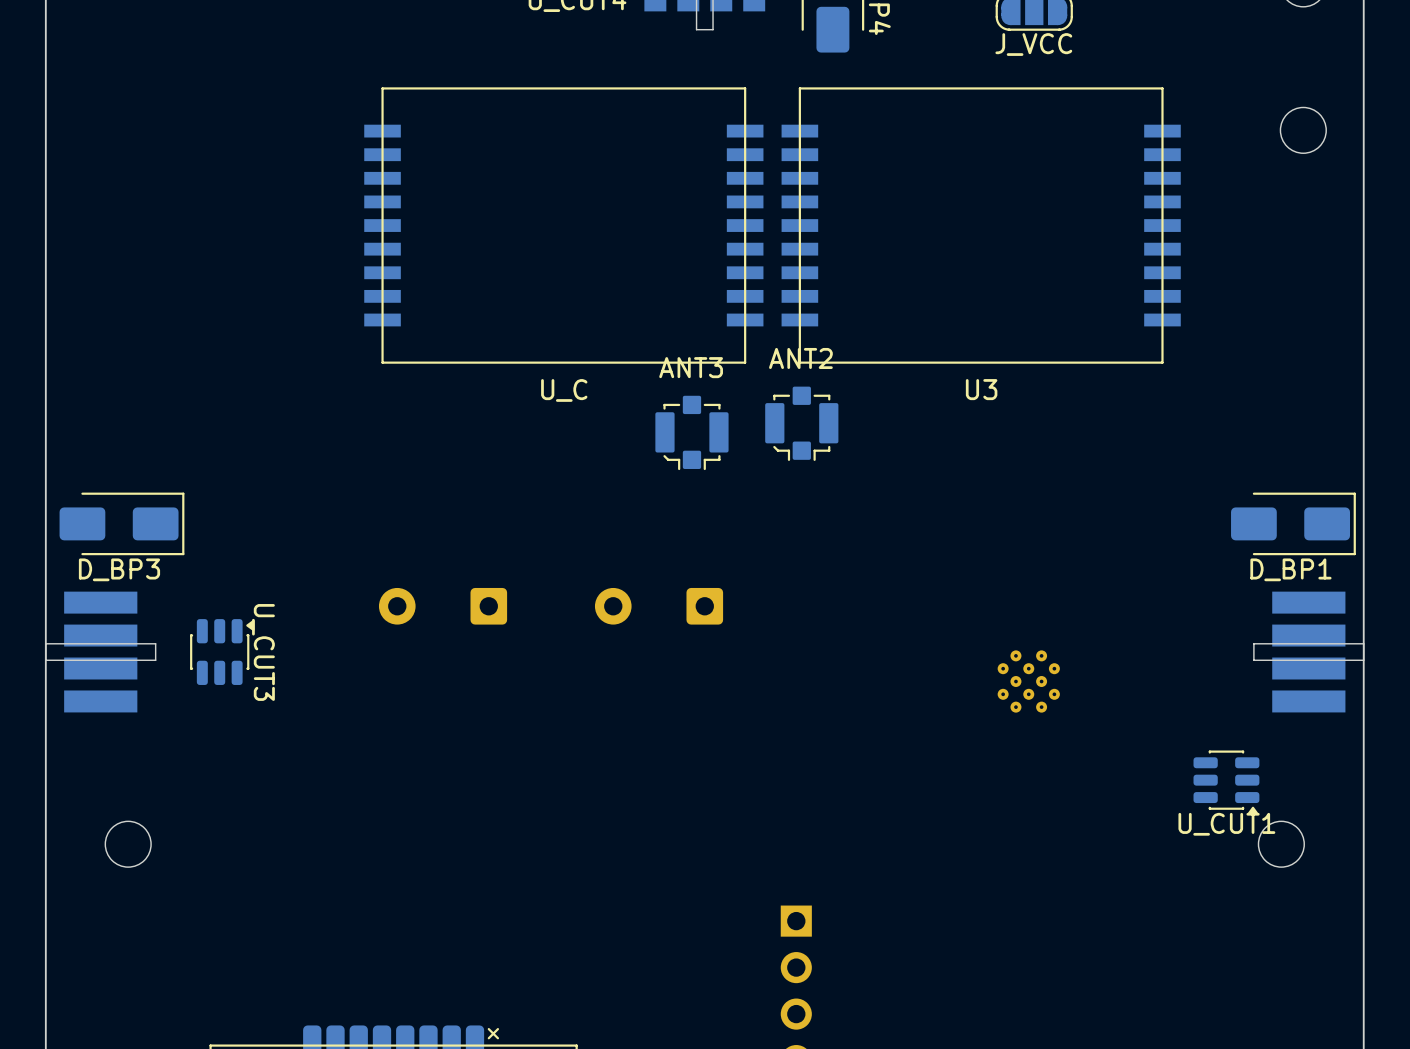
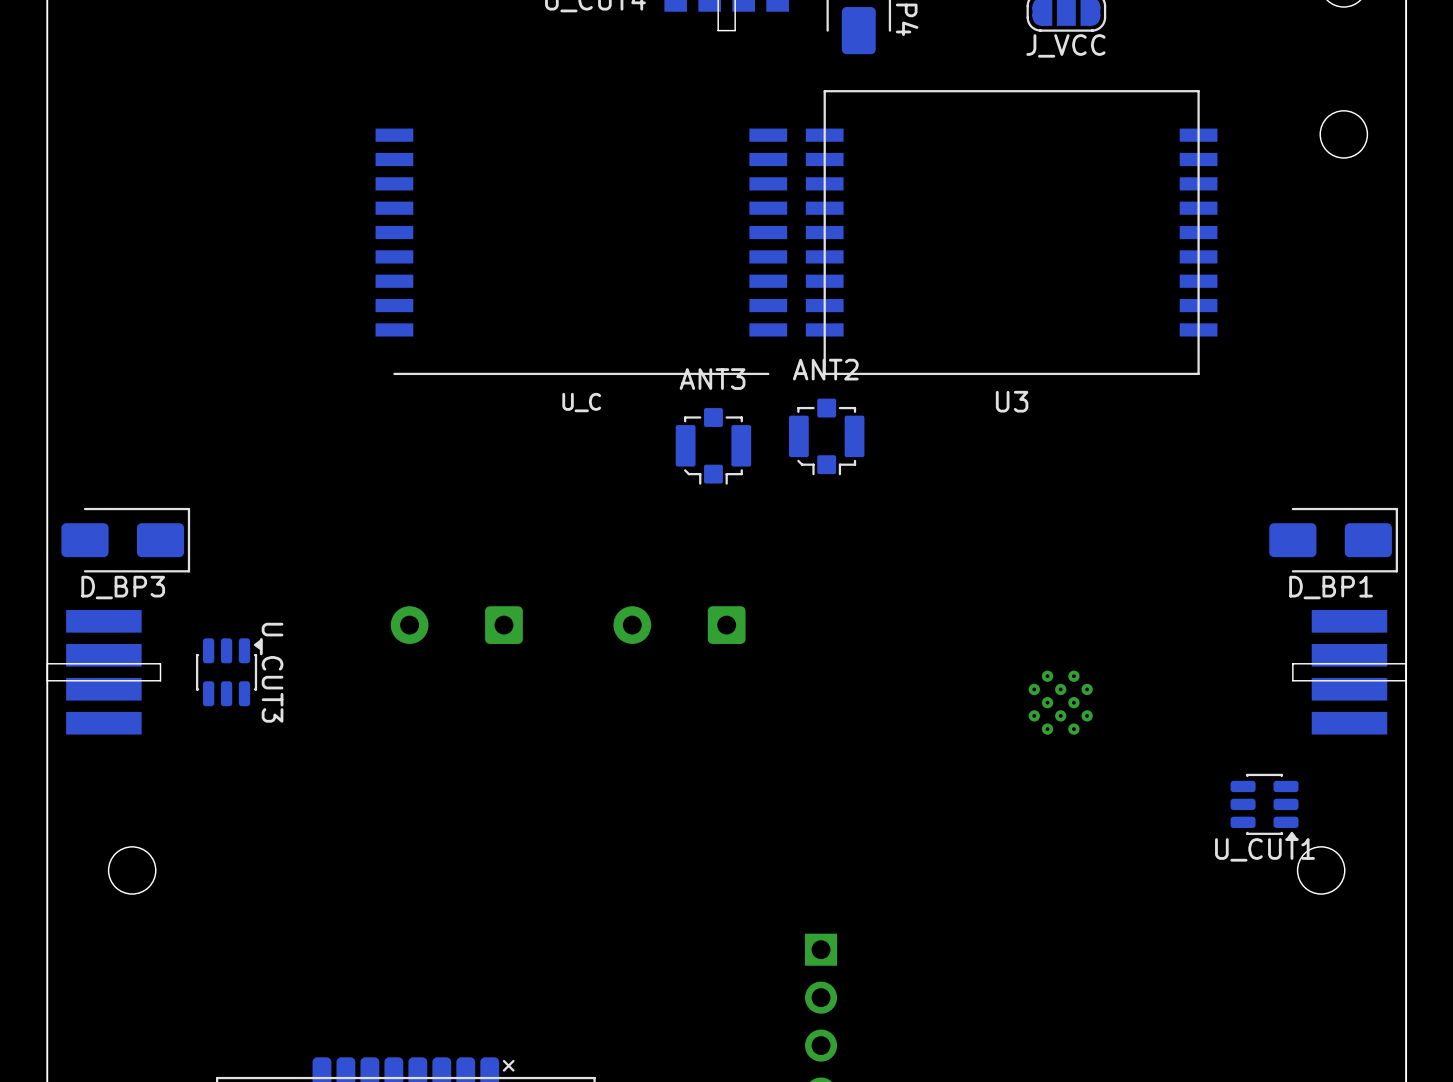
U_C: (563, 225) -> none
U_C: none -> (581, 251)

